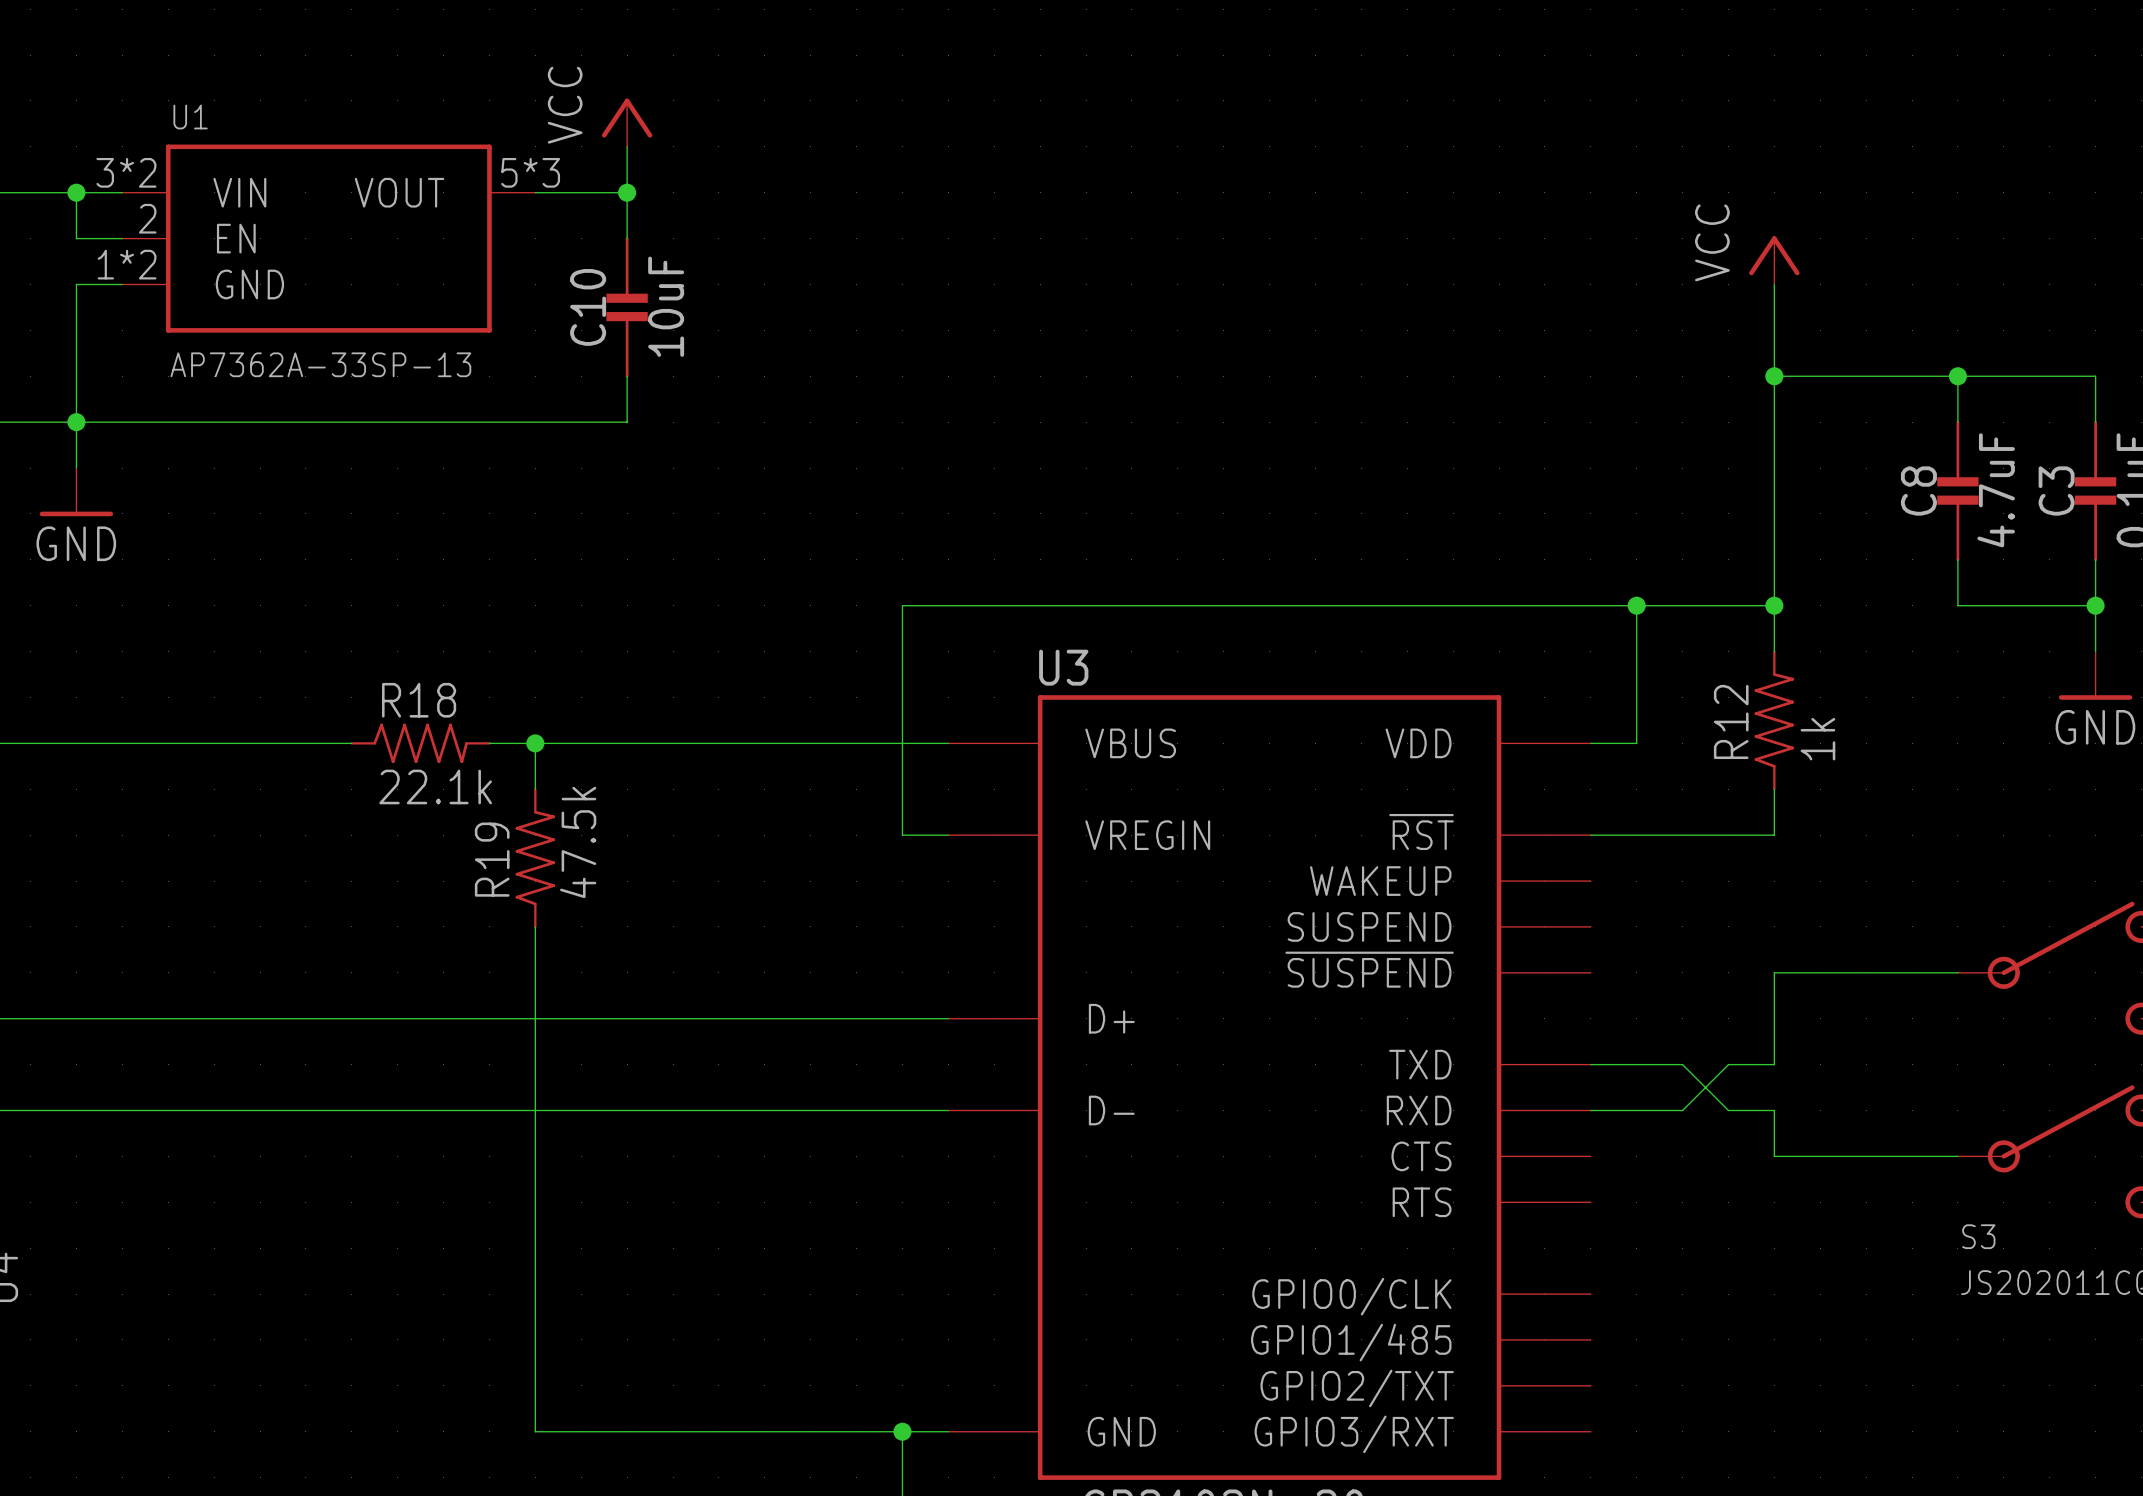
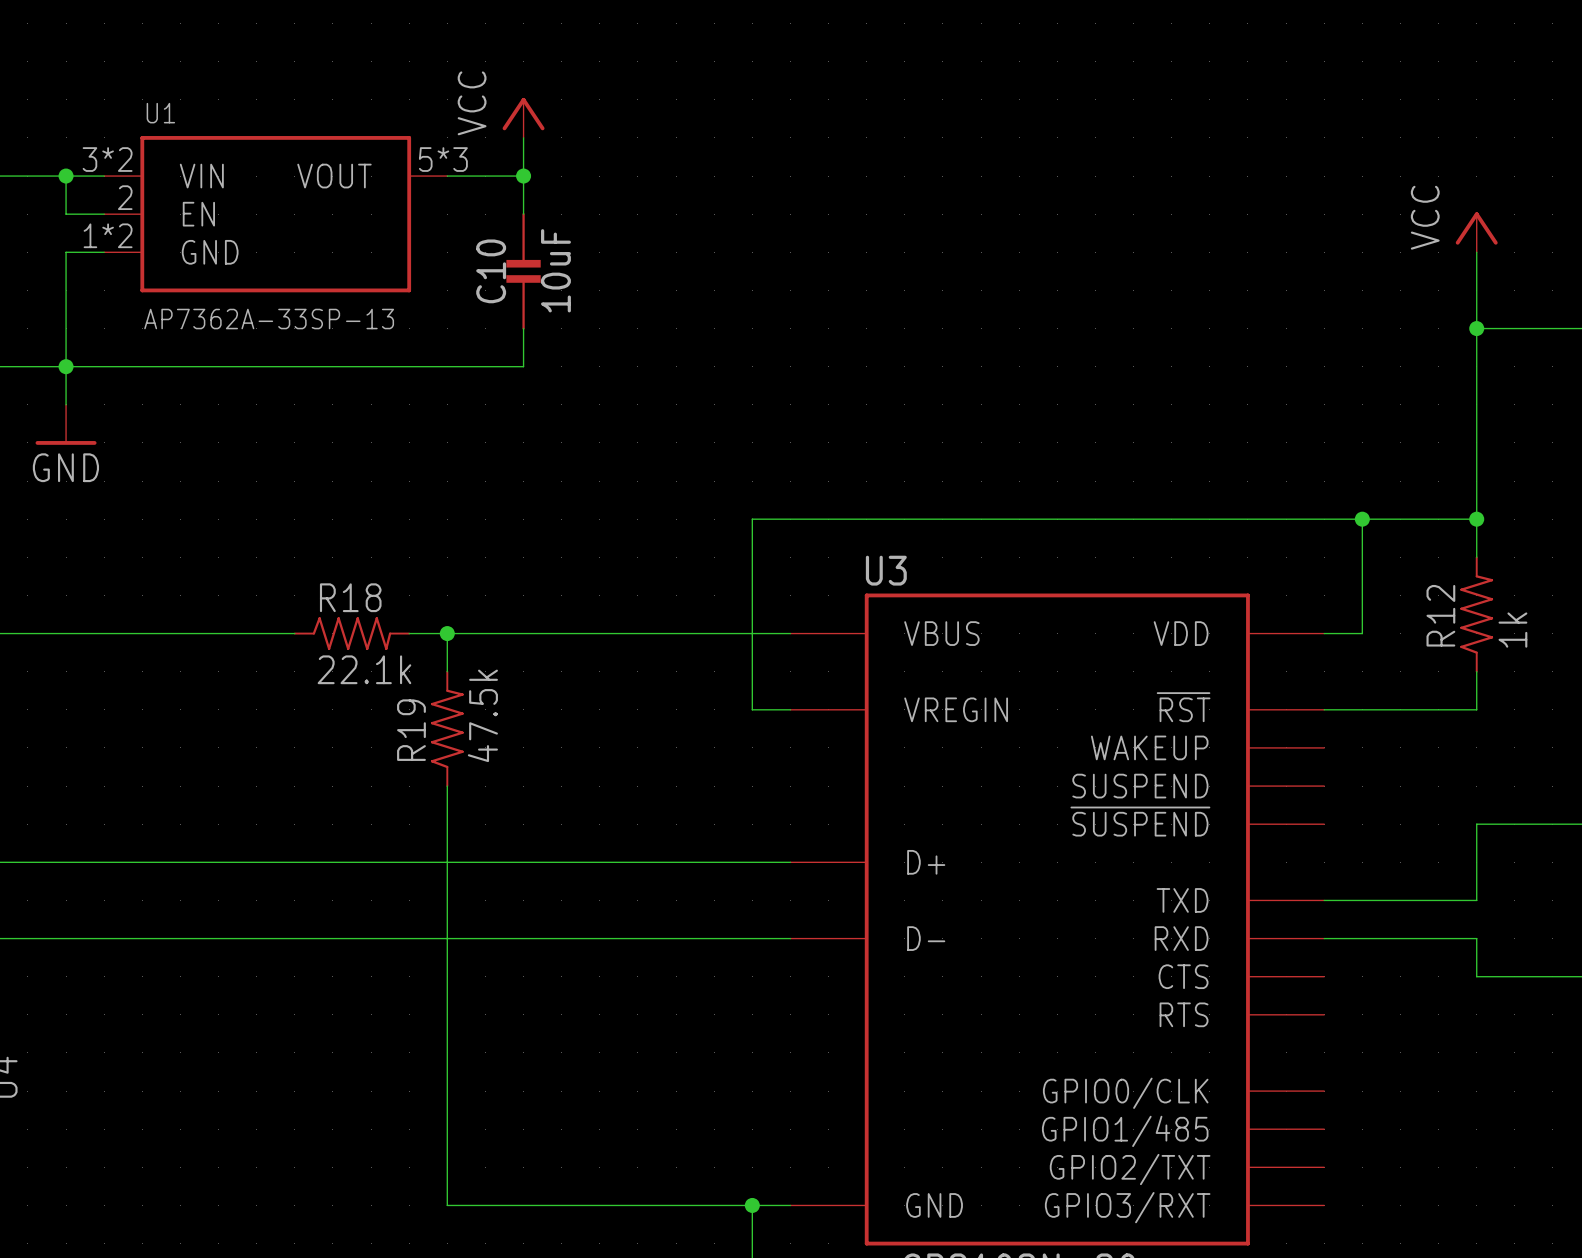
wire: (1682, 1064) (1728, 1110) -> (1400, 900) (1438, 900)
wire: (1728, 1064) (1682, 1110) -> (1438, 938) (1400, 938)

